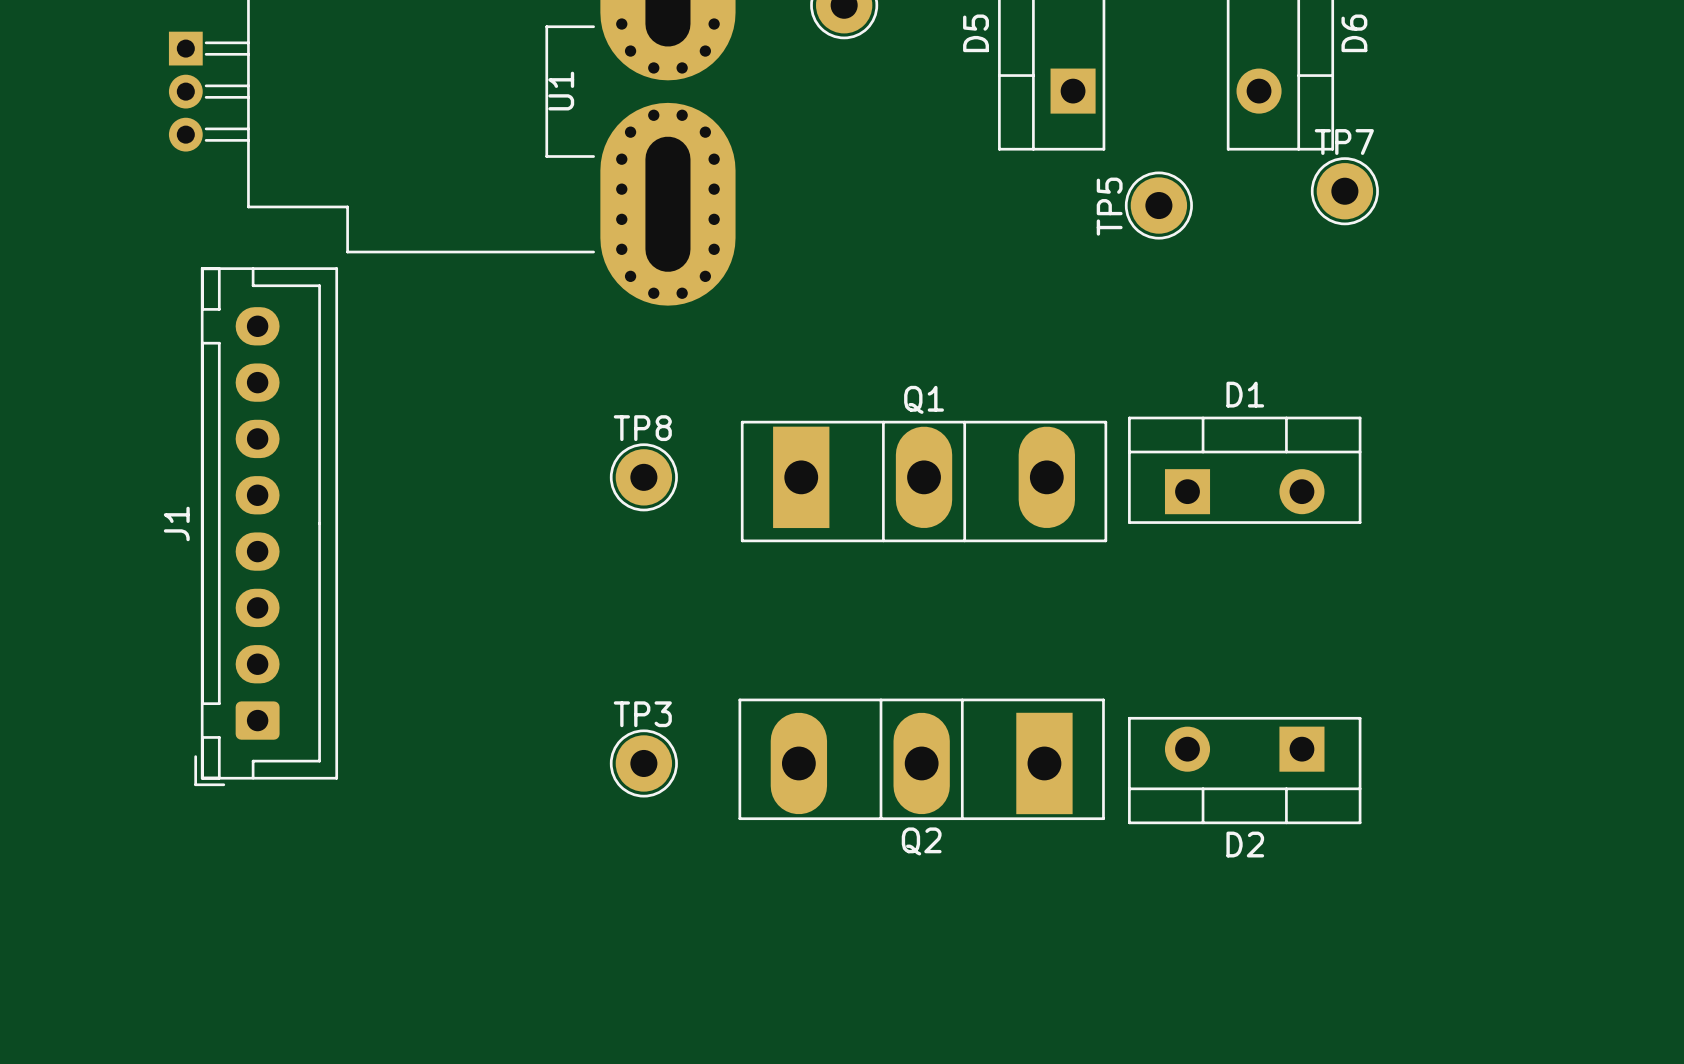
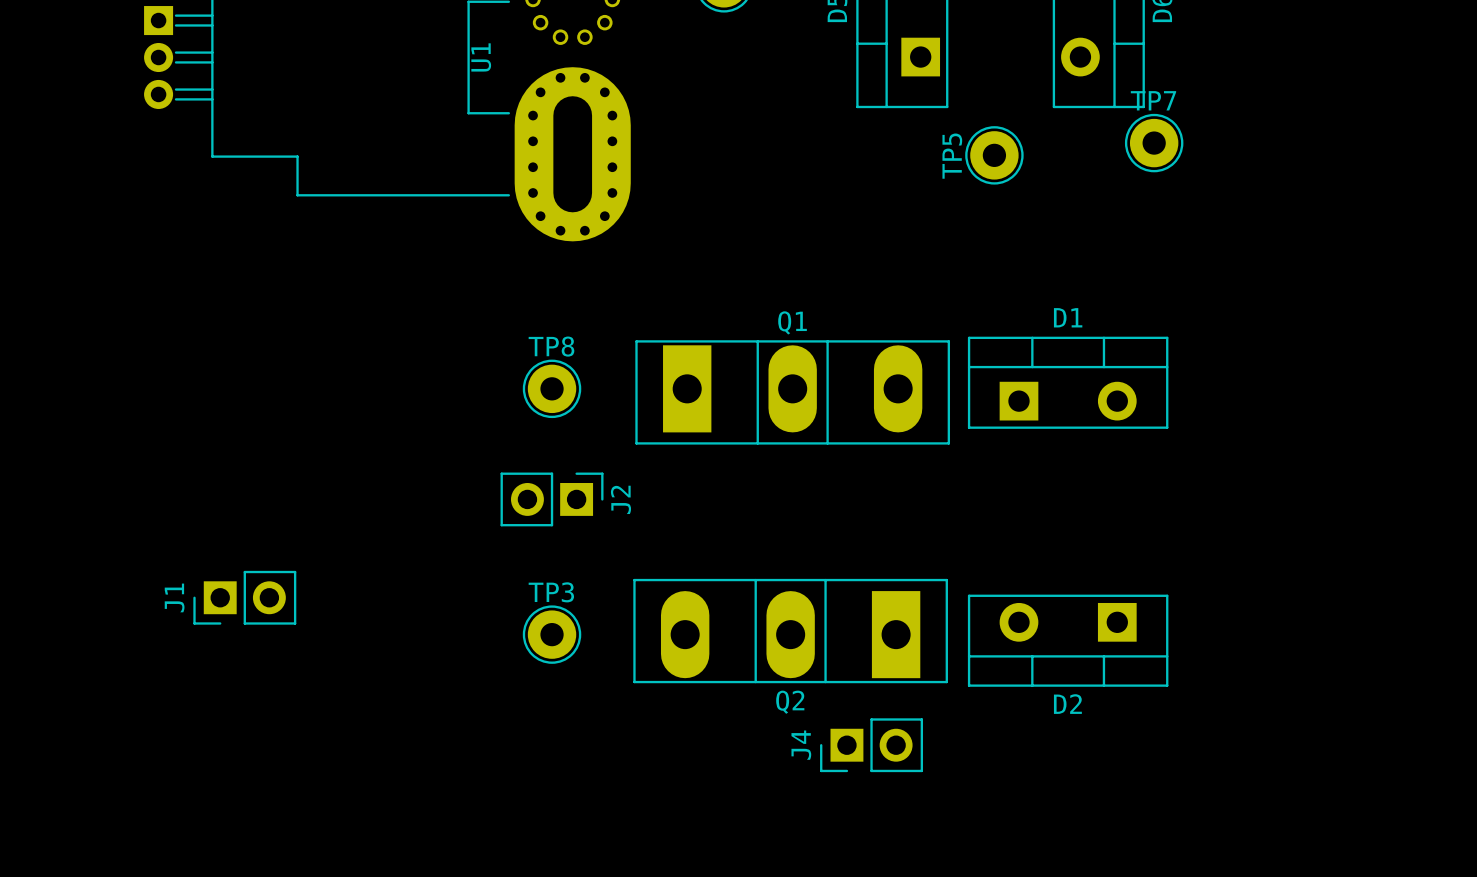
J1 footprint: [194, 267, 339, 787] -> [193, 570, 297, 625]
J2: none -> (552, 499)
J4: none -> (871, 745)

